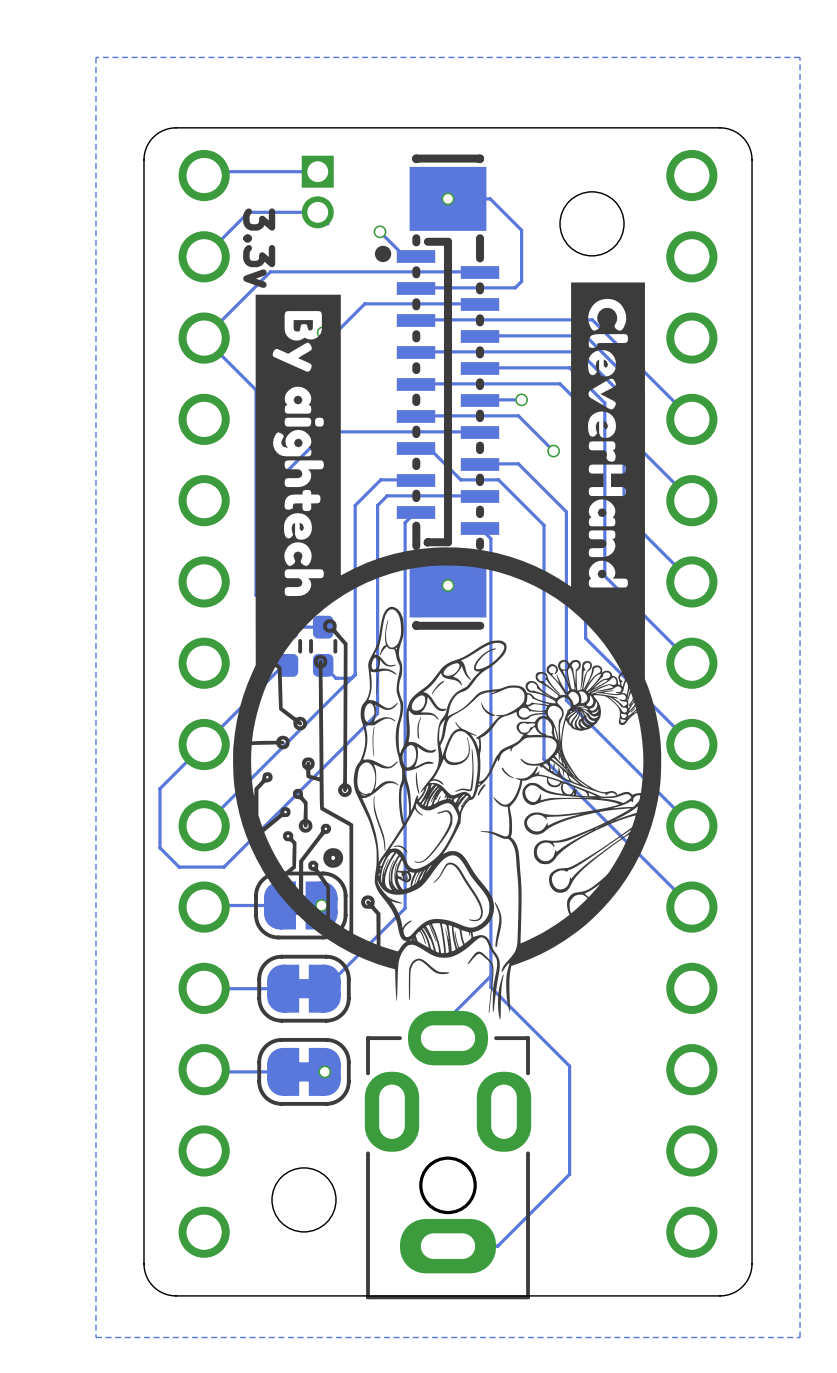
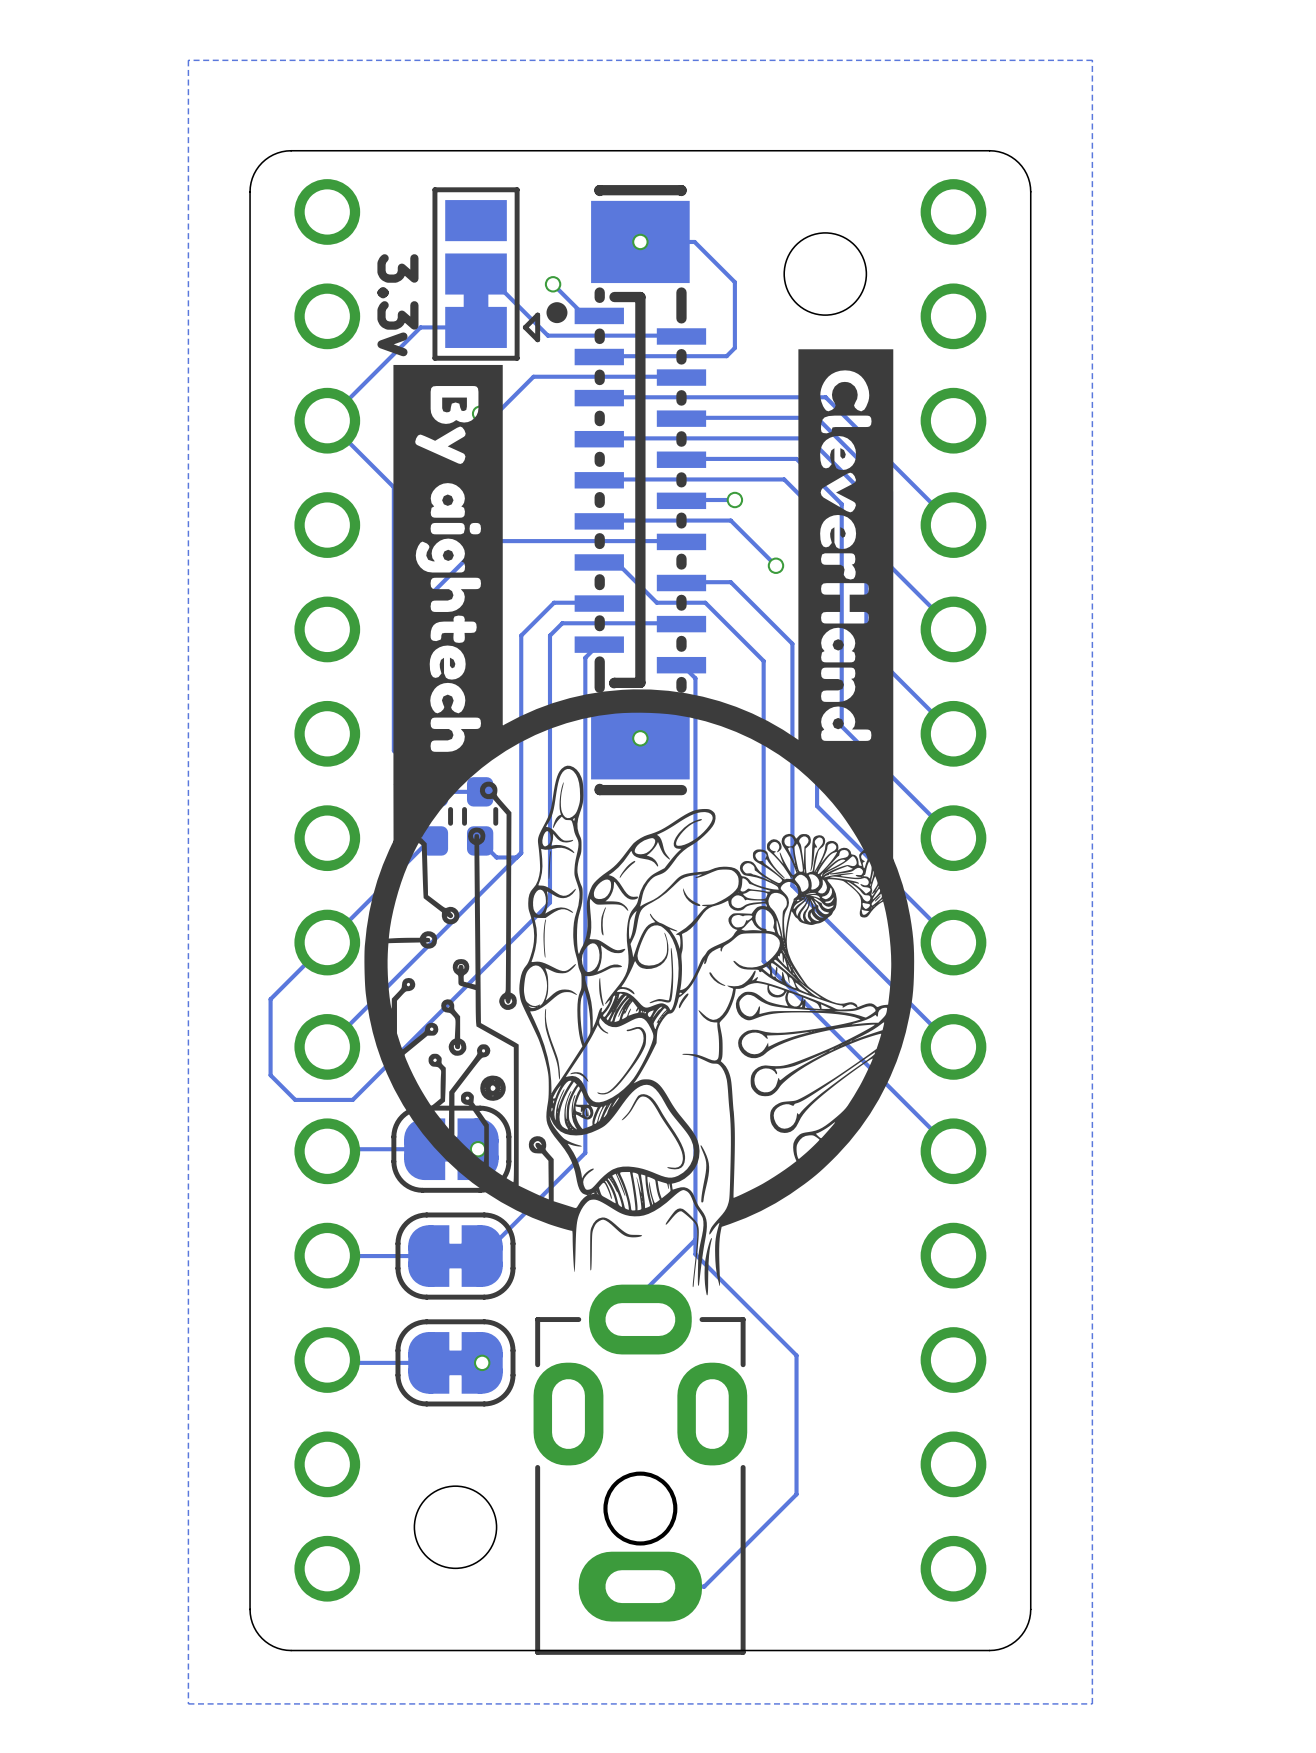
track: (317, 171) (207, 171) (204, 175) -> none
part: (317, 192) -> none
track: (317, 212) (248, 212) (204, 256) -> none
track: none -> (486, 274) (547, 335)
part: none -> (486, 274)
track: (376, 271) (270, 271) -> (476, 327) (420, 327) (412, 335)

